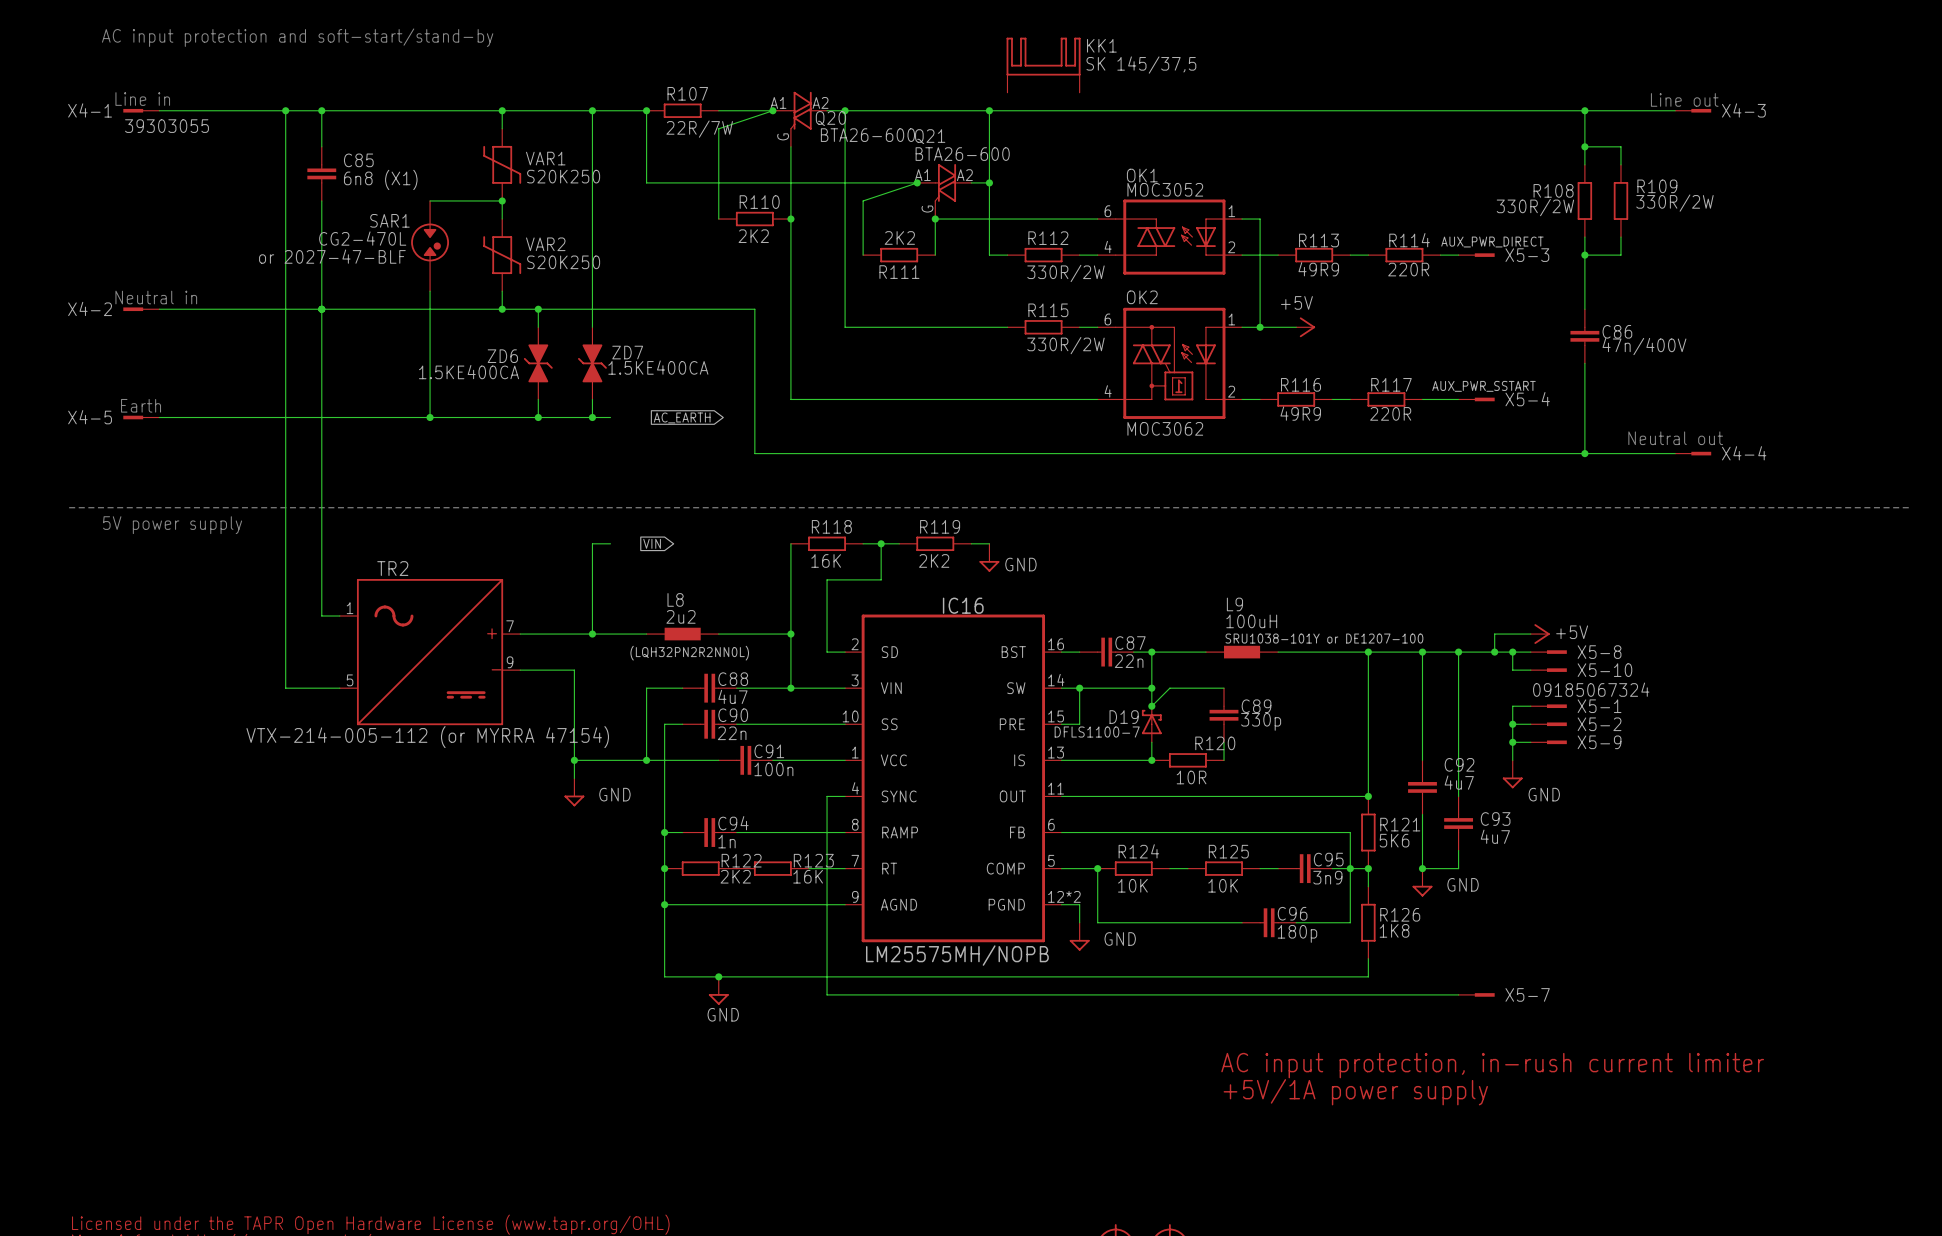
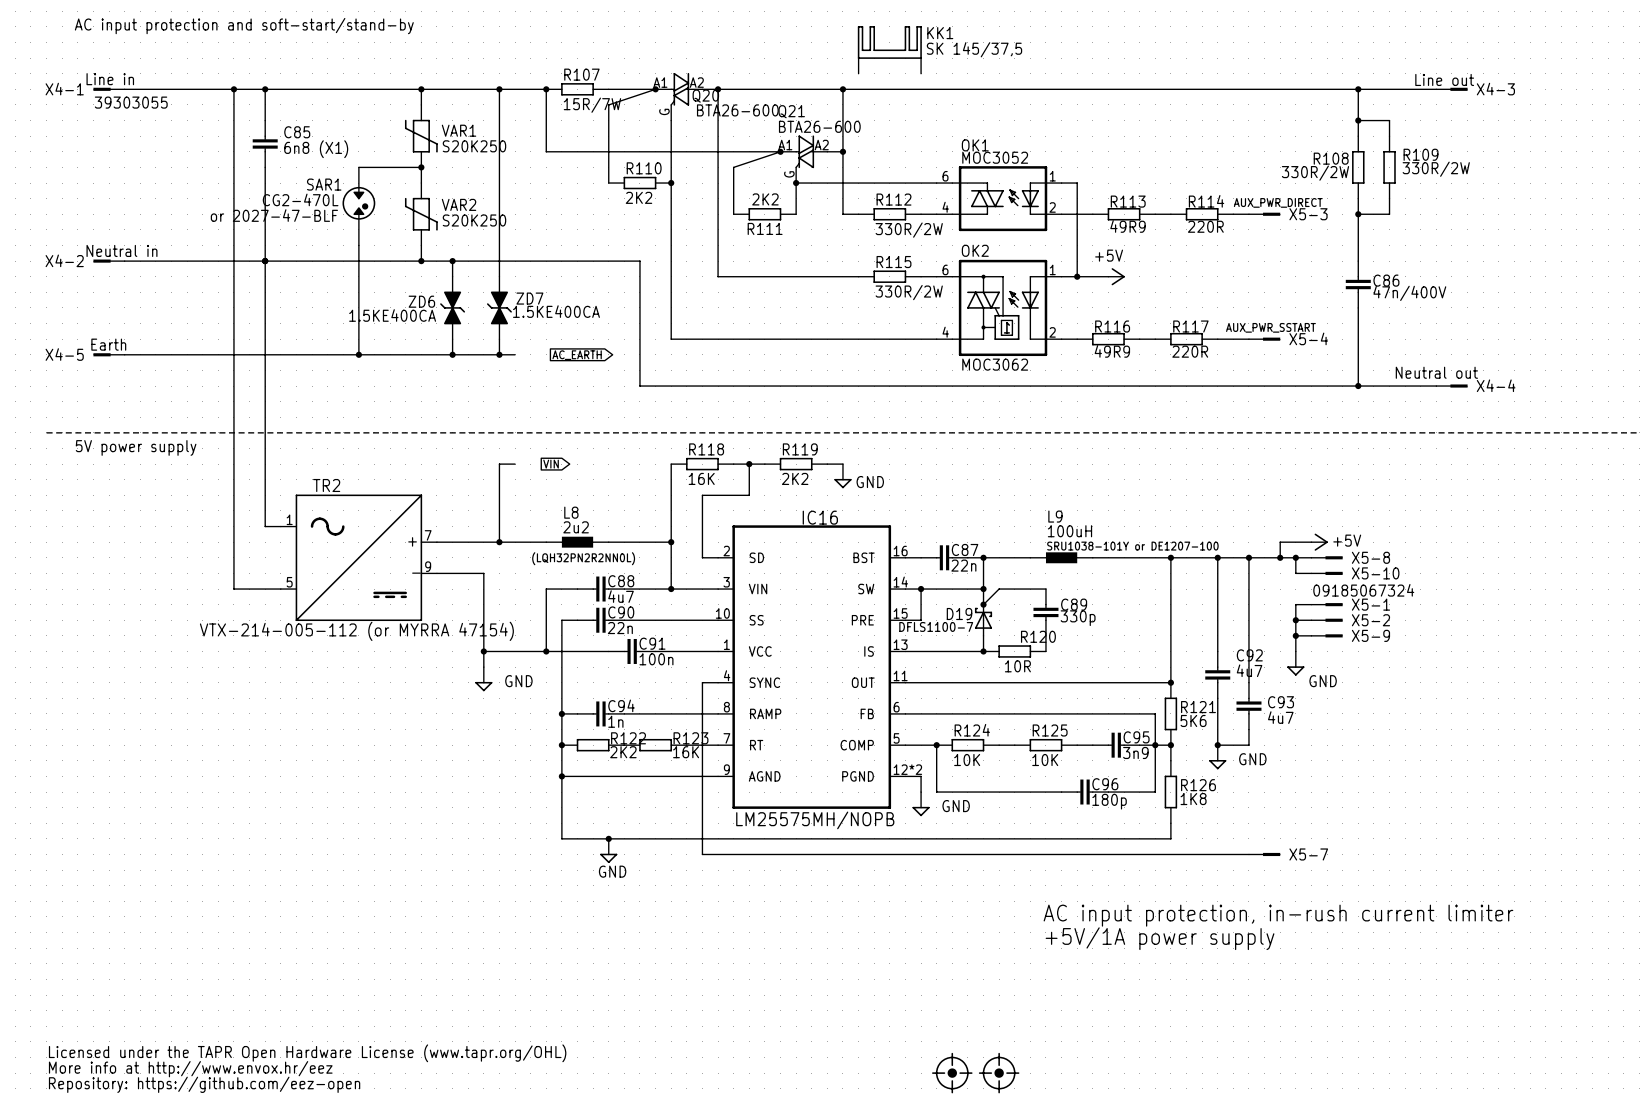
R107 value: 22R/7W (699, 129) -> 15R/7W (592, 105)

